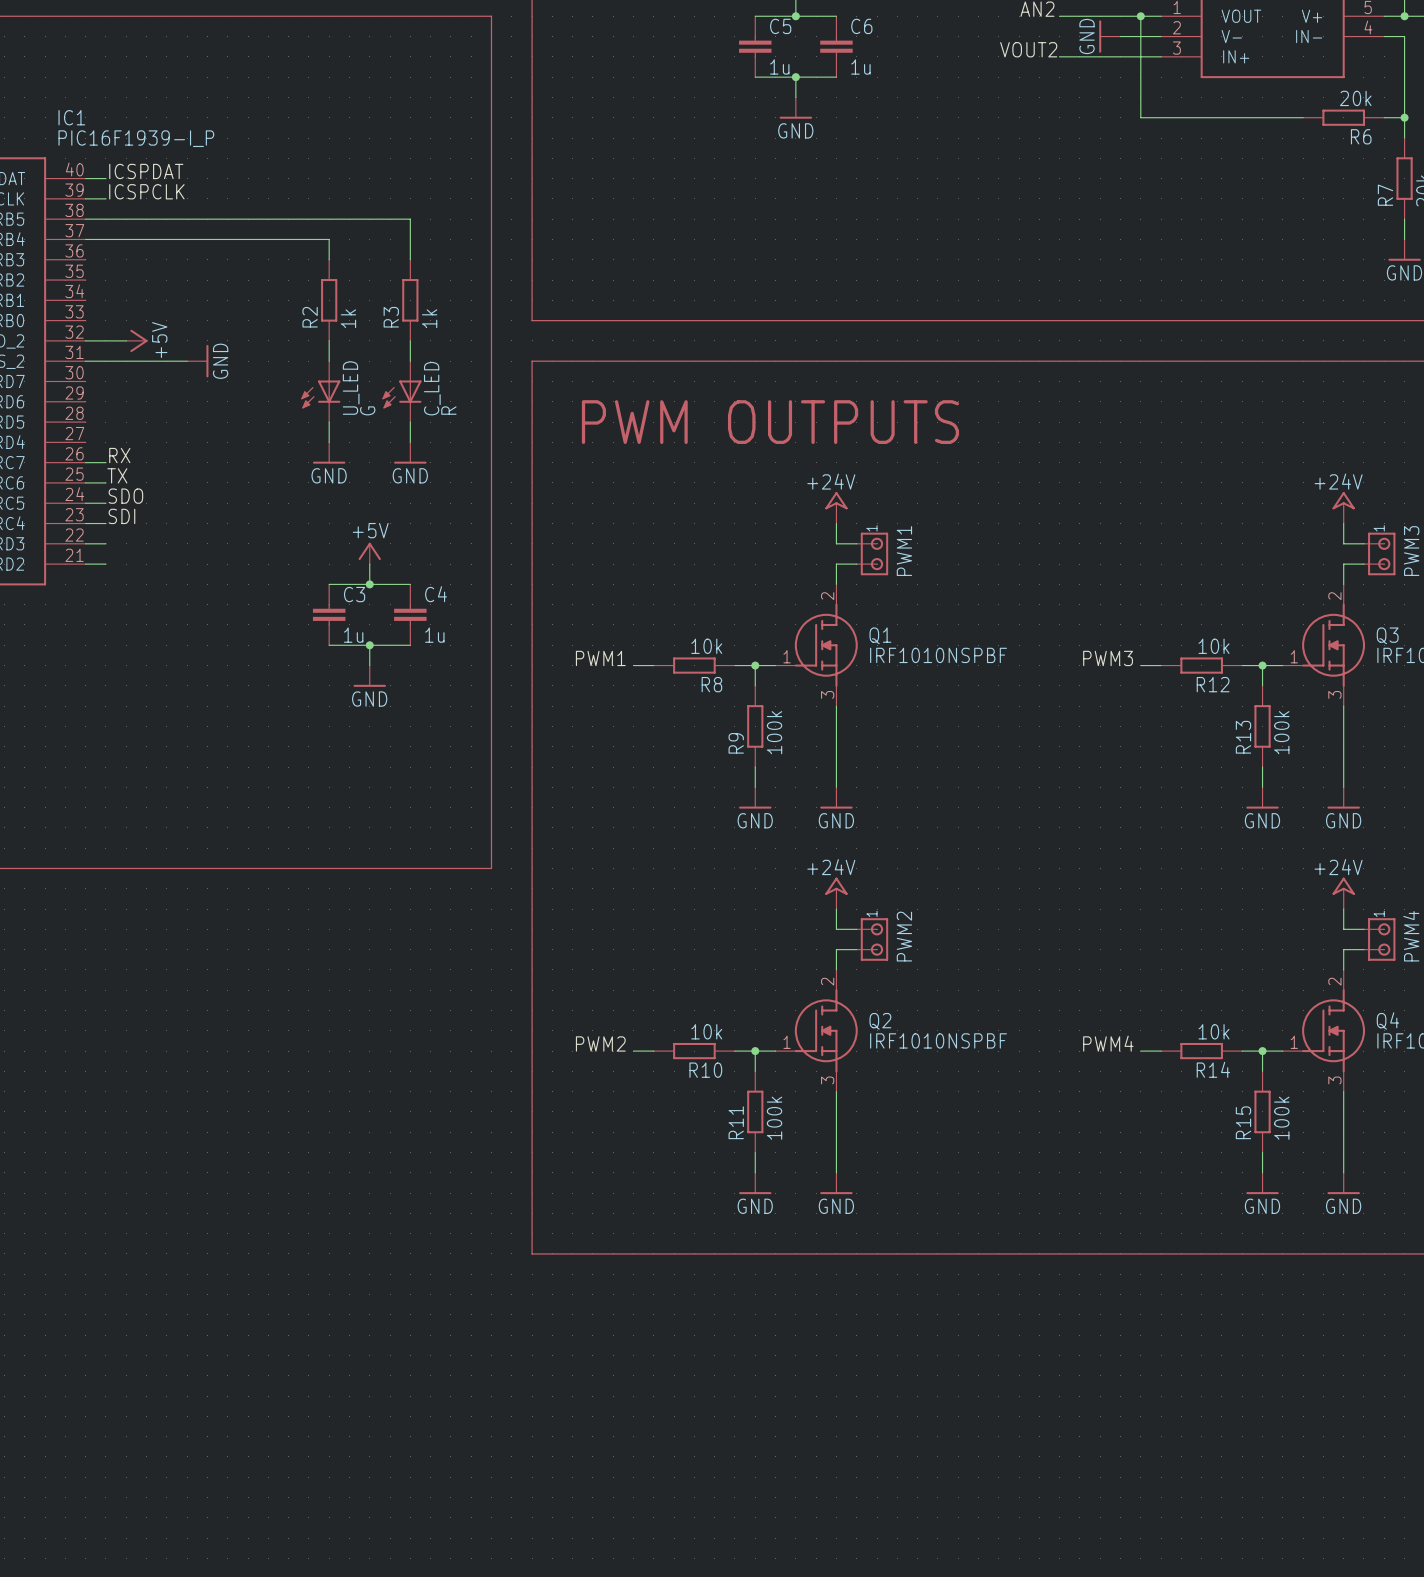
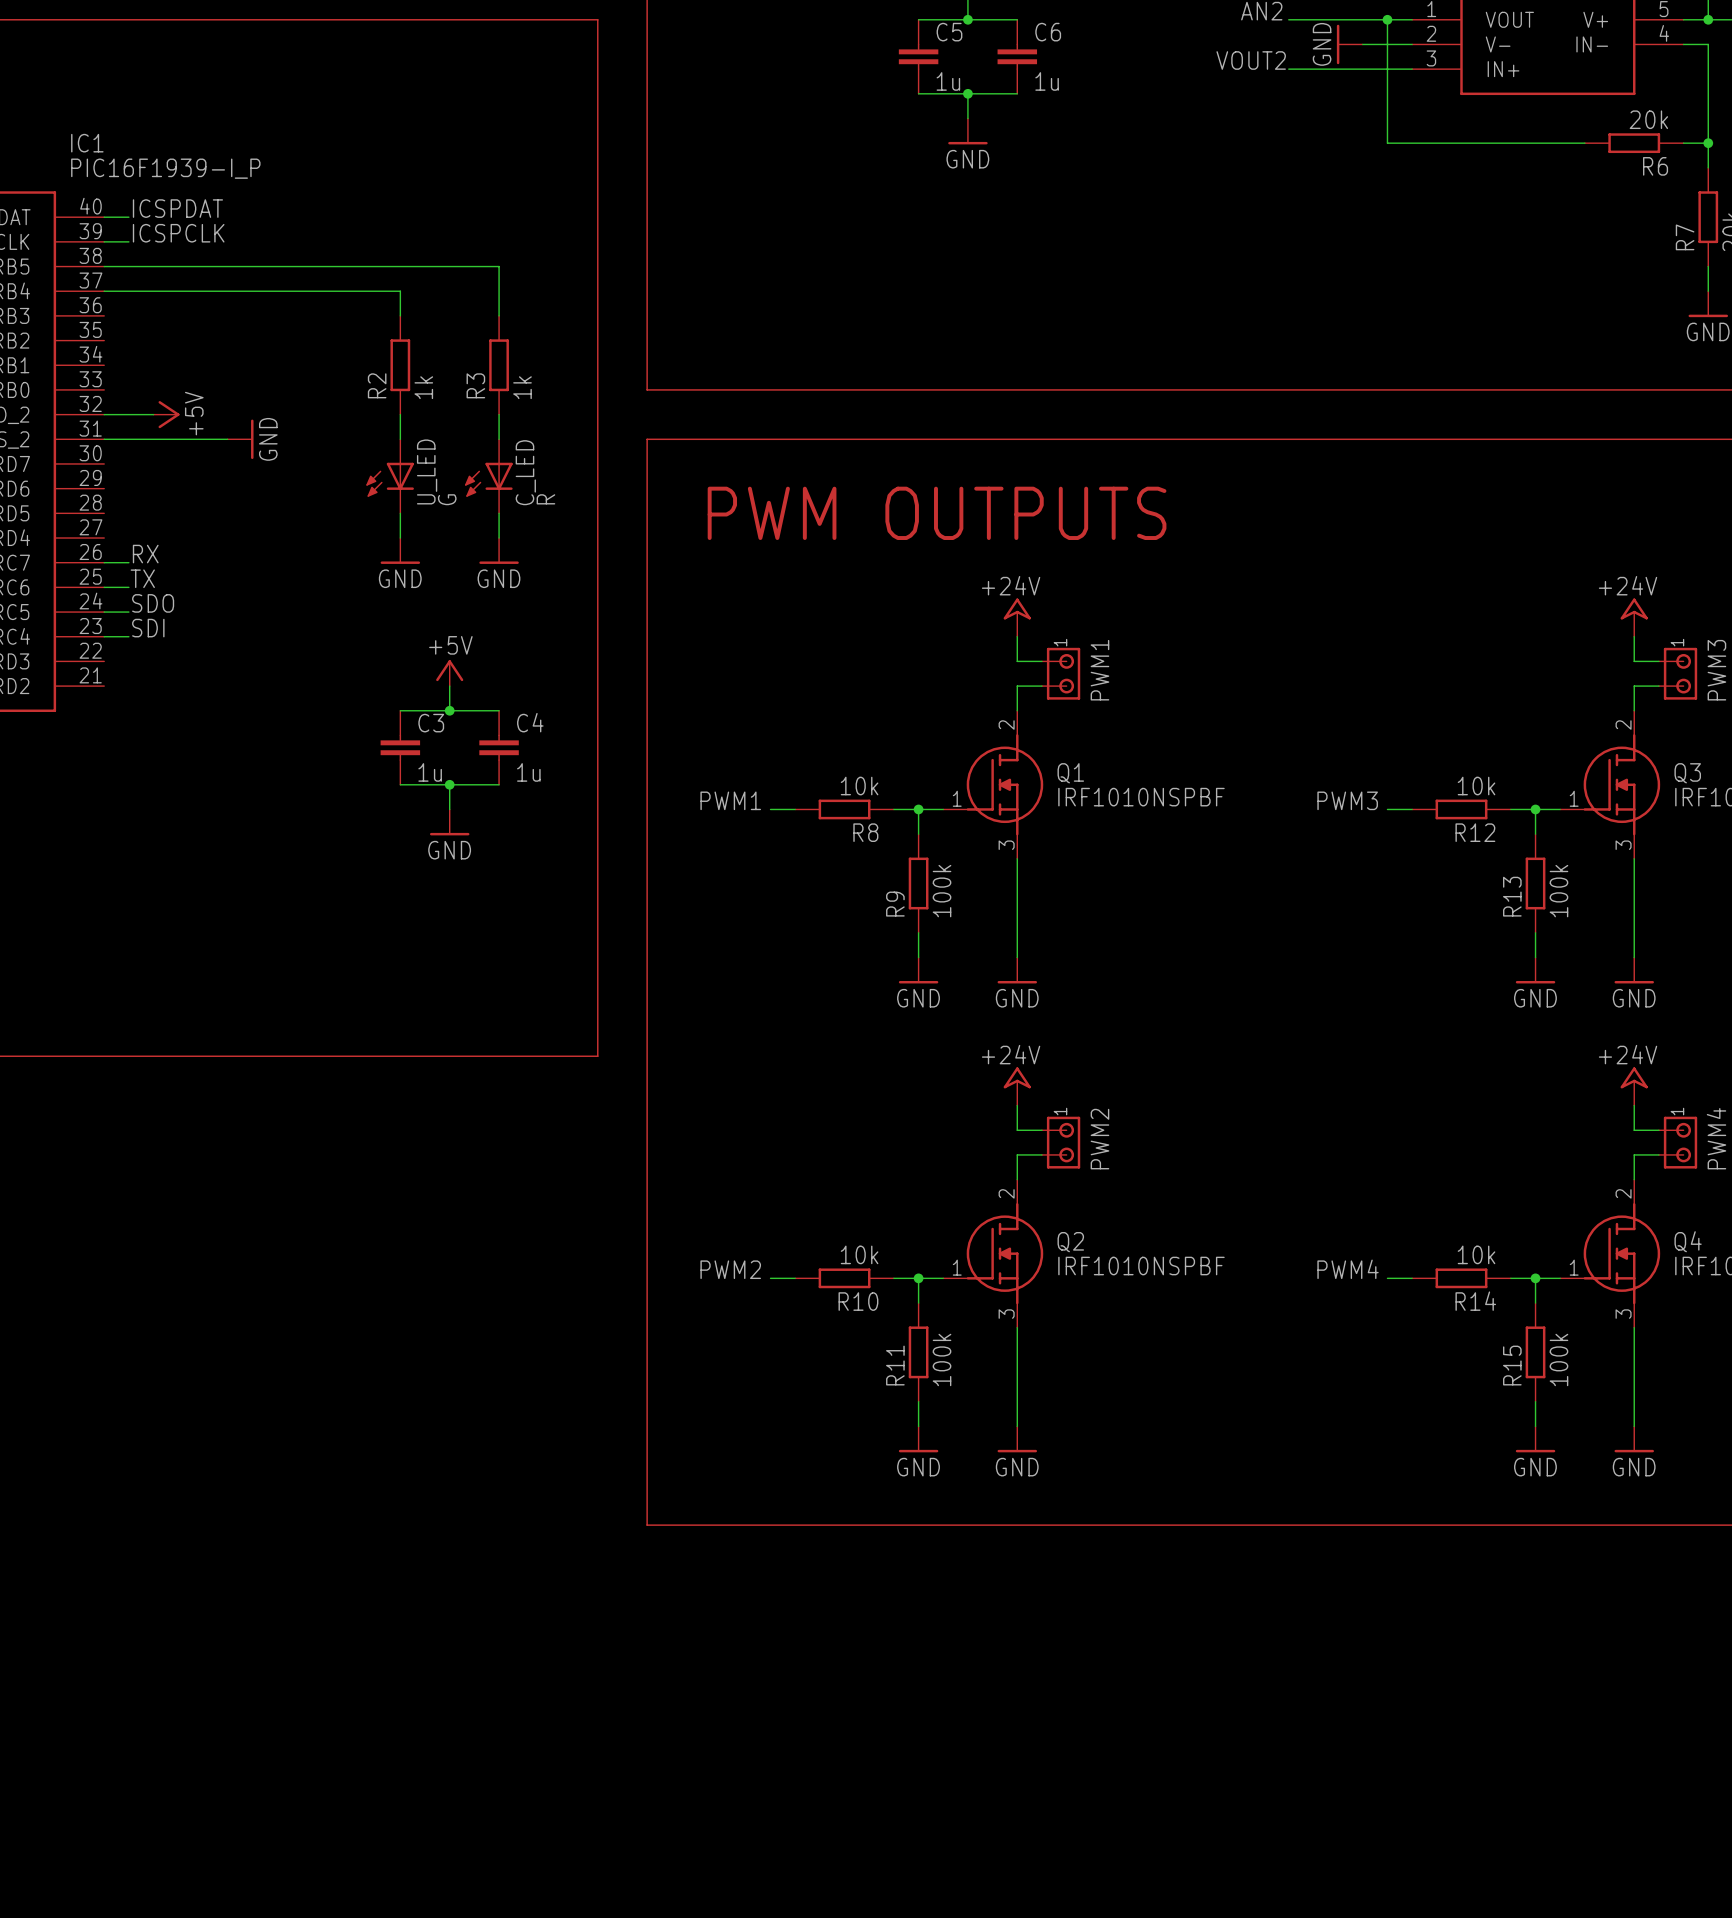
wire: (85, 543) (105, 543) -> none
wire: (85, 564) (105, 564) -> none

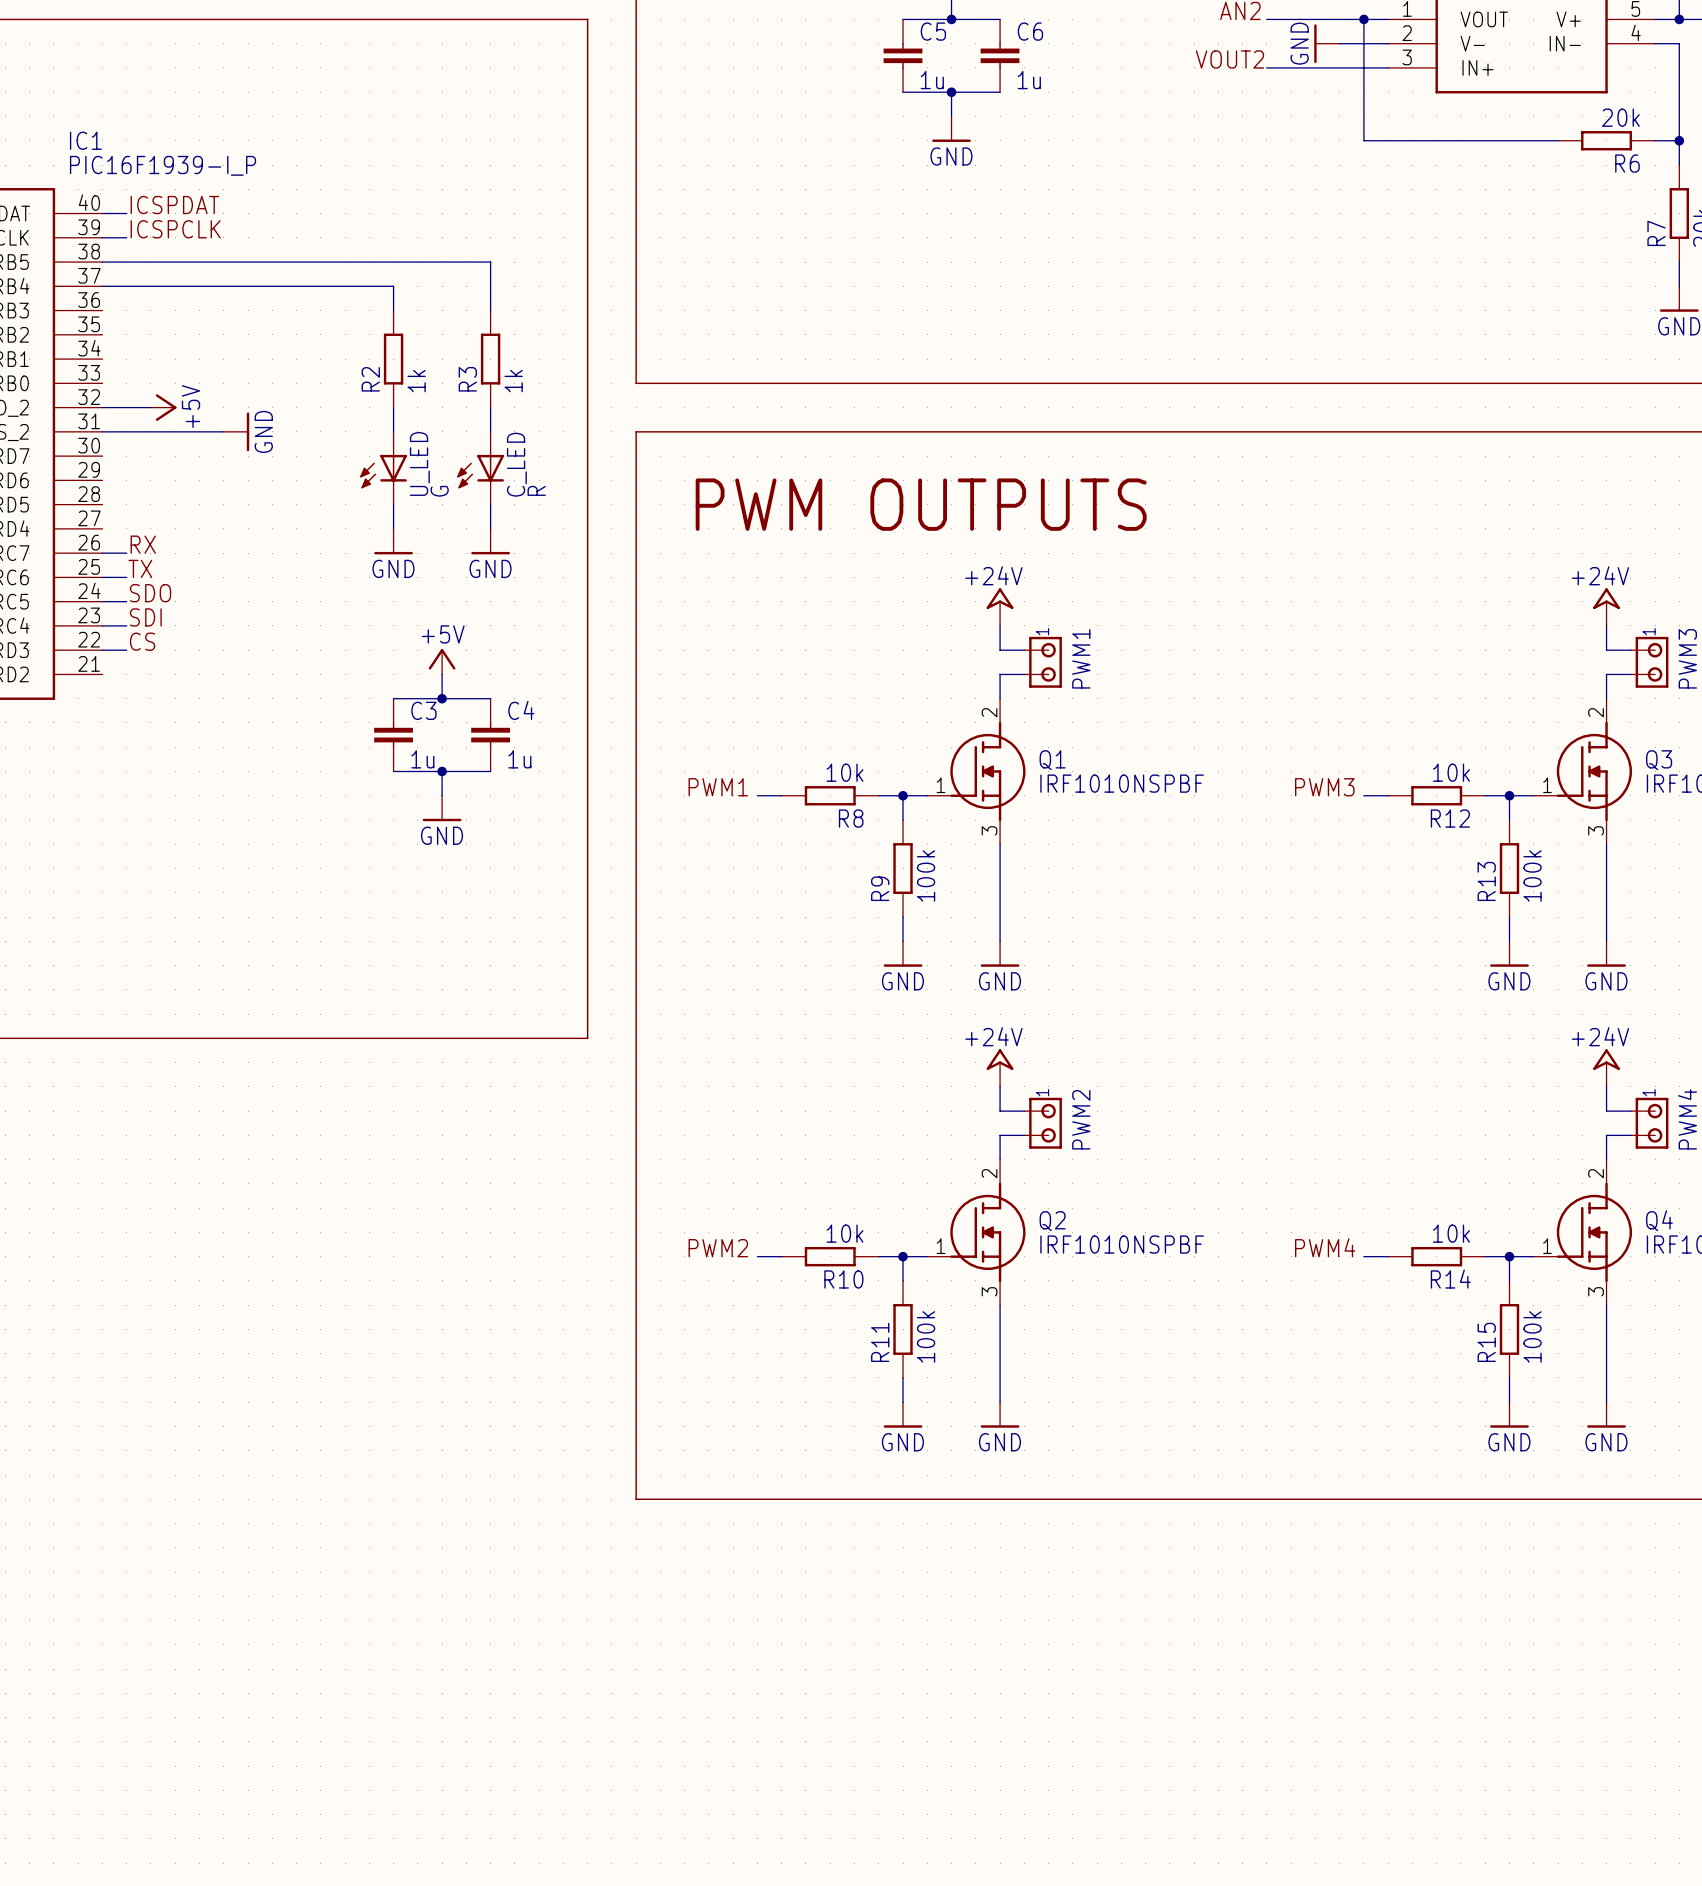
label: none -> CS (142, 641)
wire: none -> (102, 650) (126, 650)

